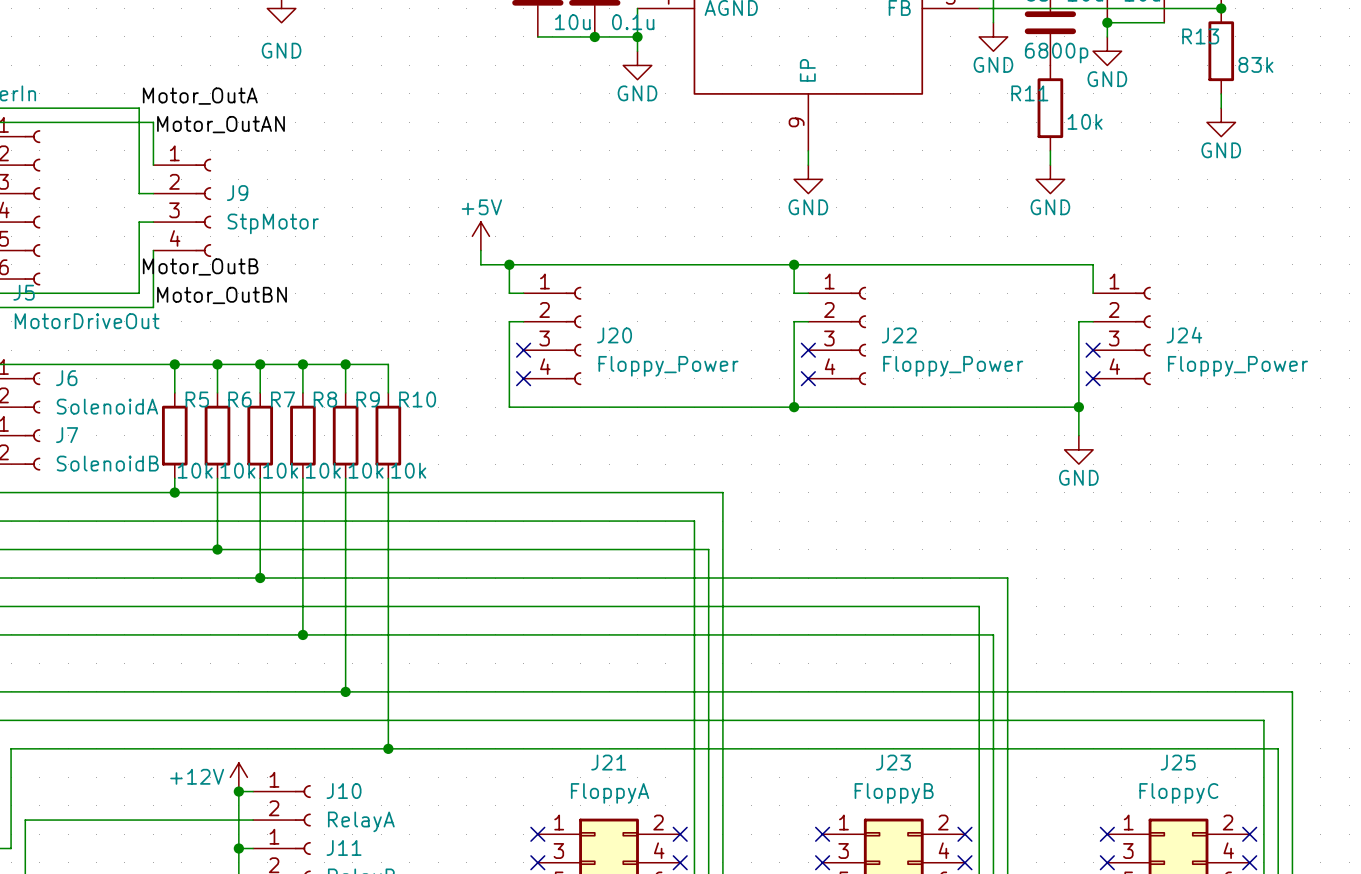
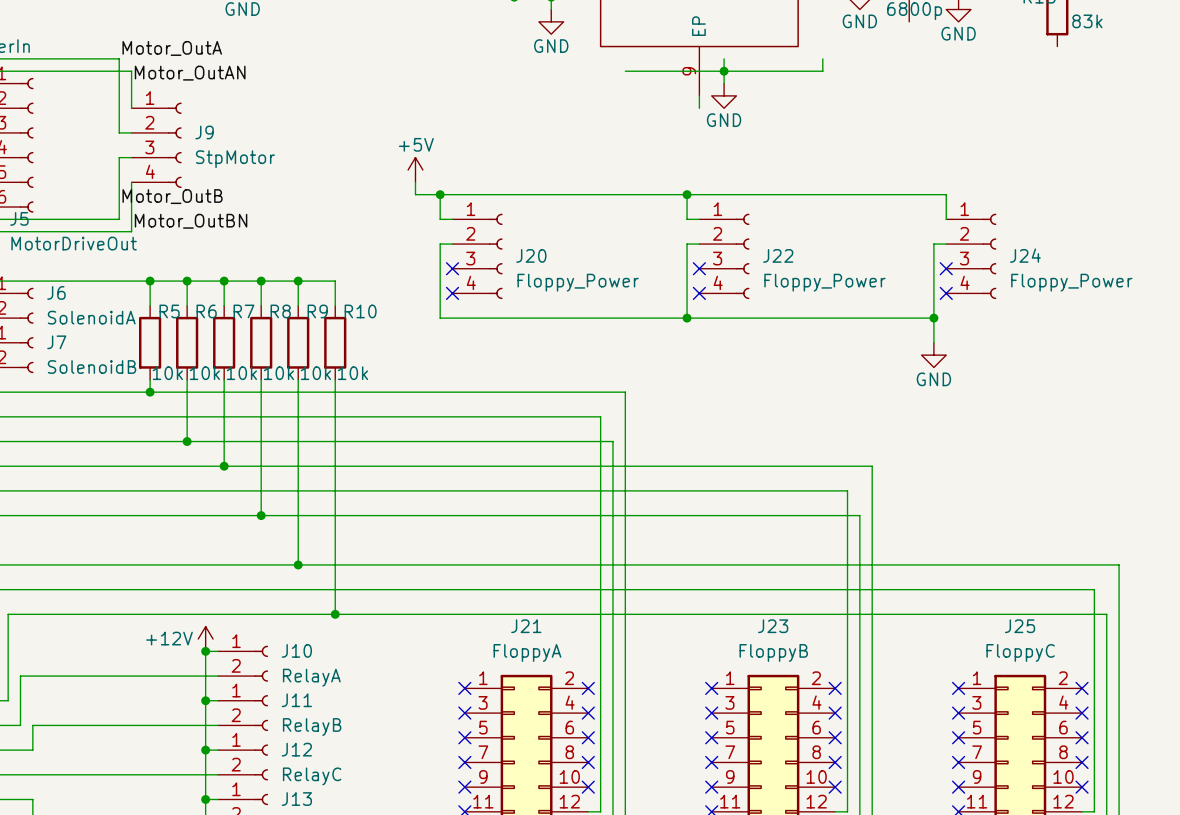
wire: (1221, 93) (1221, 108) -> none
wire: none -> (724, 58) (724, 83)
wire: none -> (822, 58) (822, 71) (625, 71)
R11: 10k (1050, 108) -> none
junction: none -> (724, 71)
power symbol: GND (1221, 122) -> none
wire: (1050, 150) (1050, 165) -> none
power symbol position: GND (808, 179) -> GND (724, 95)
power symbol: GND (1050, 179) -> none

